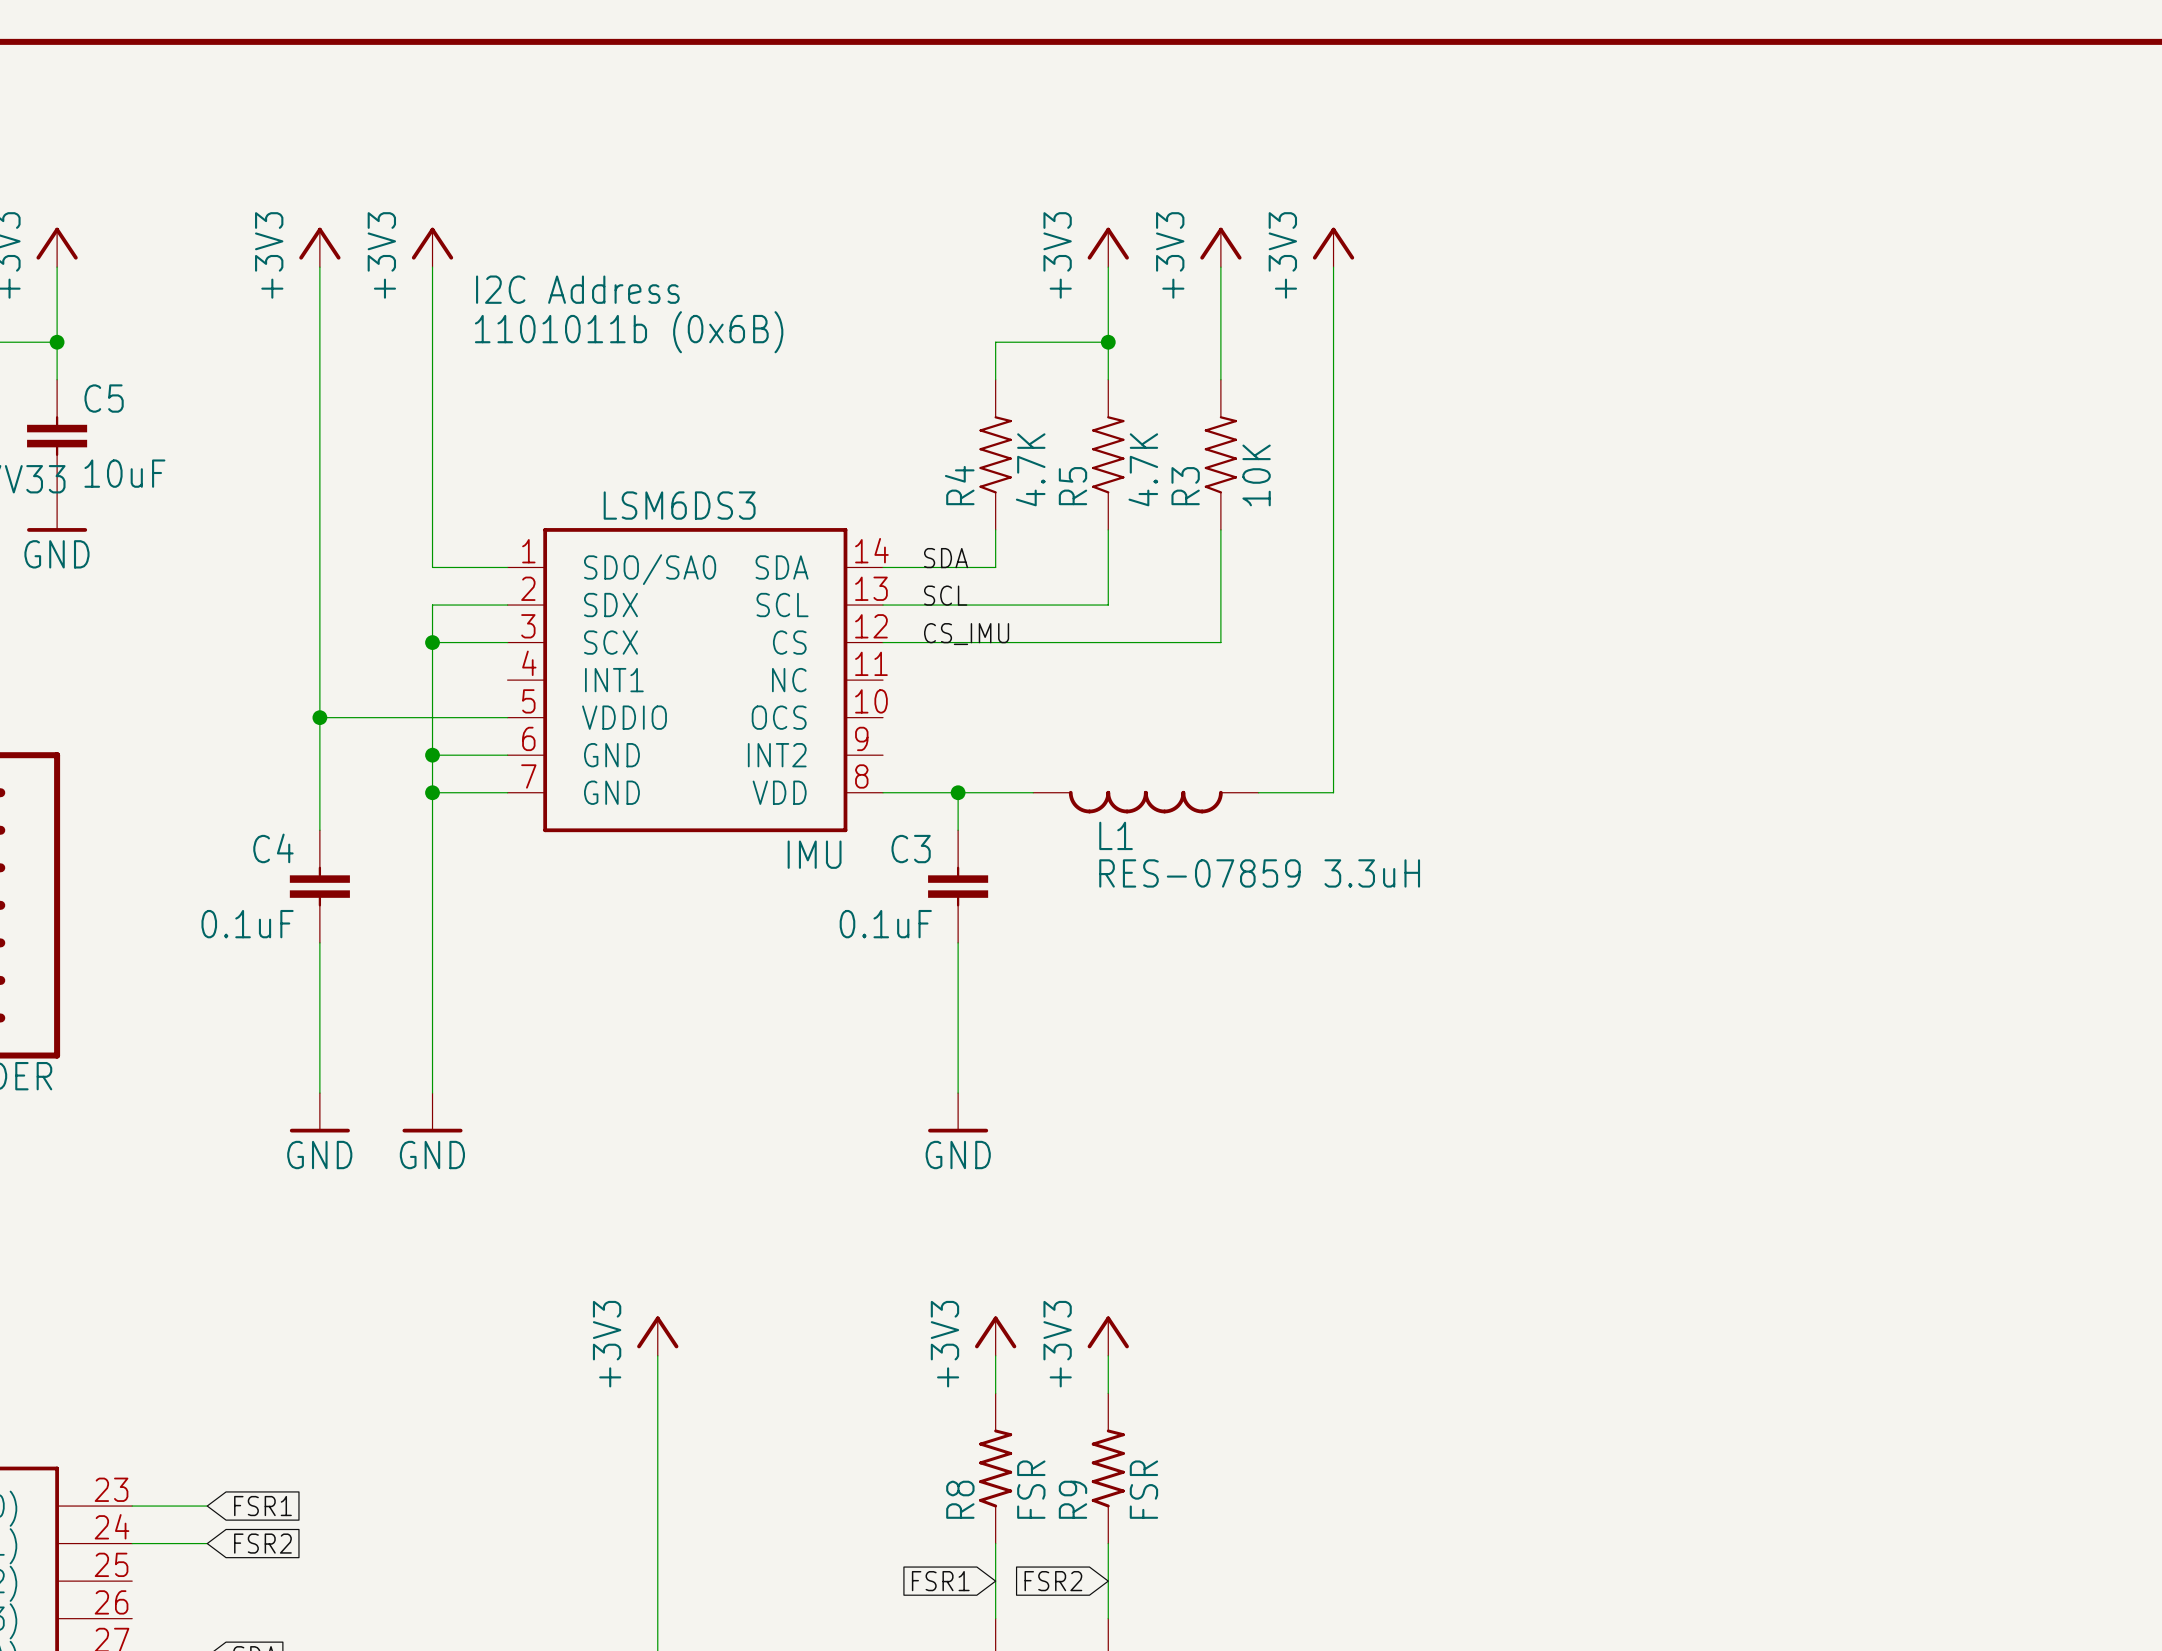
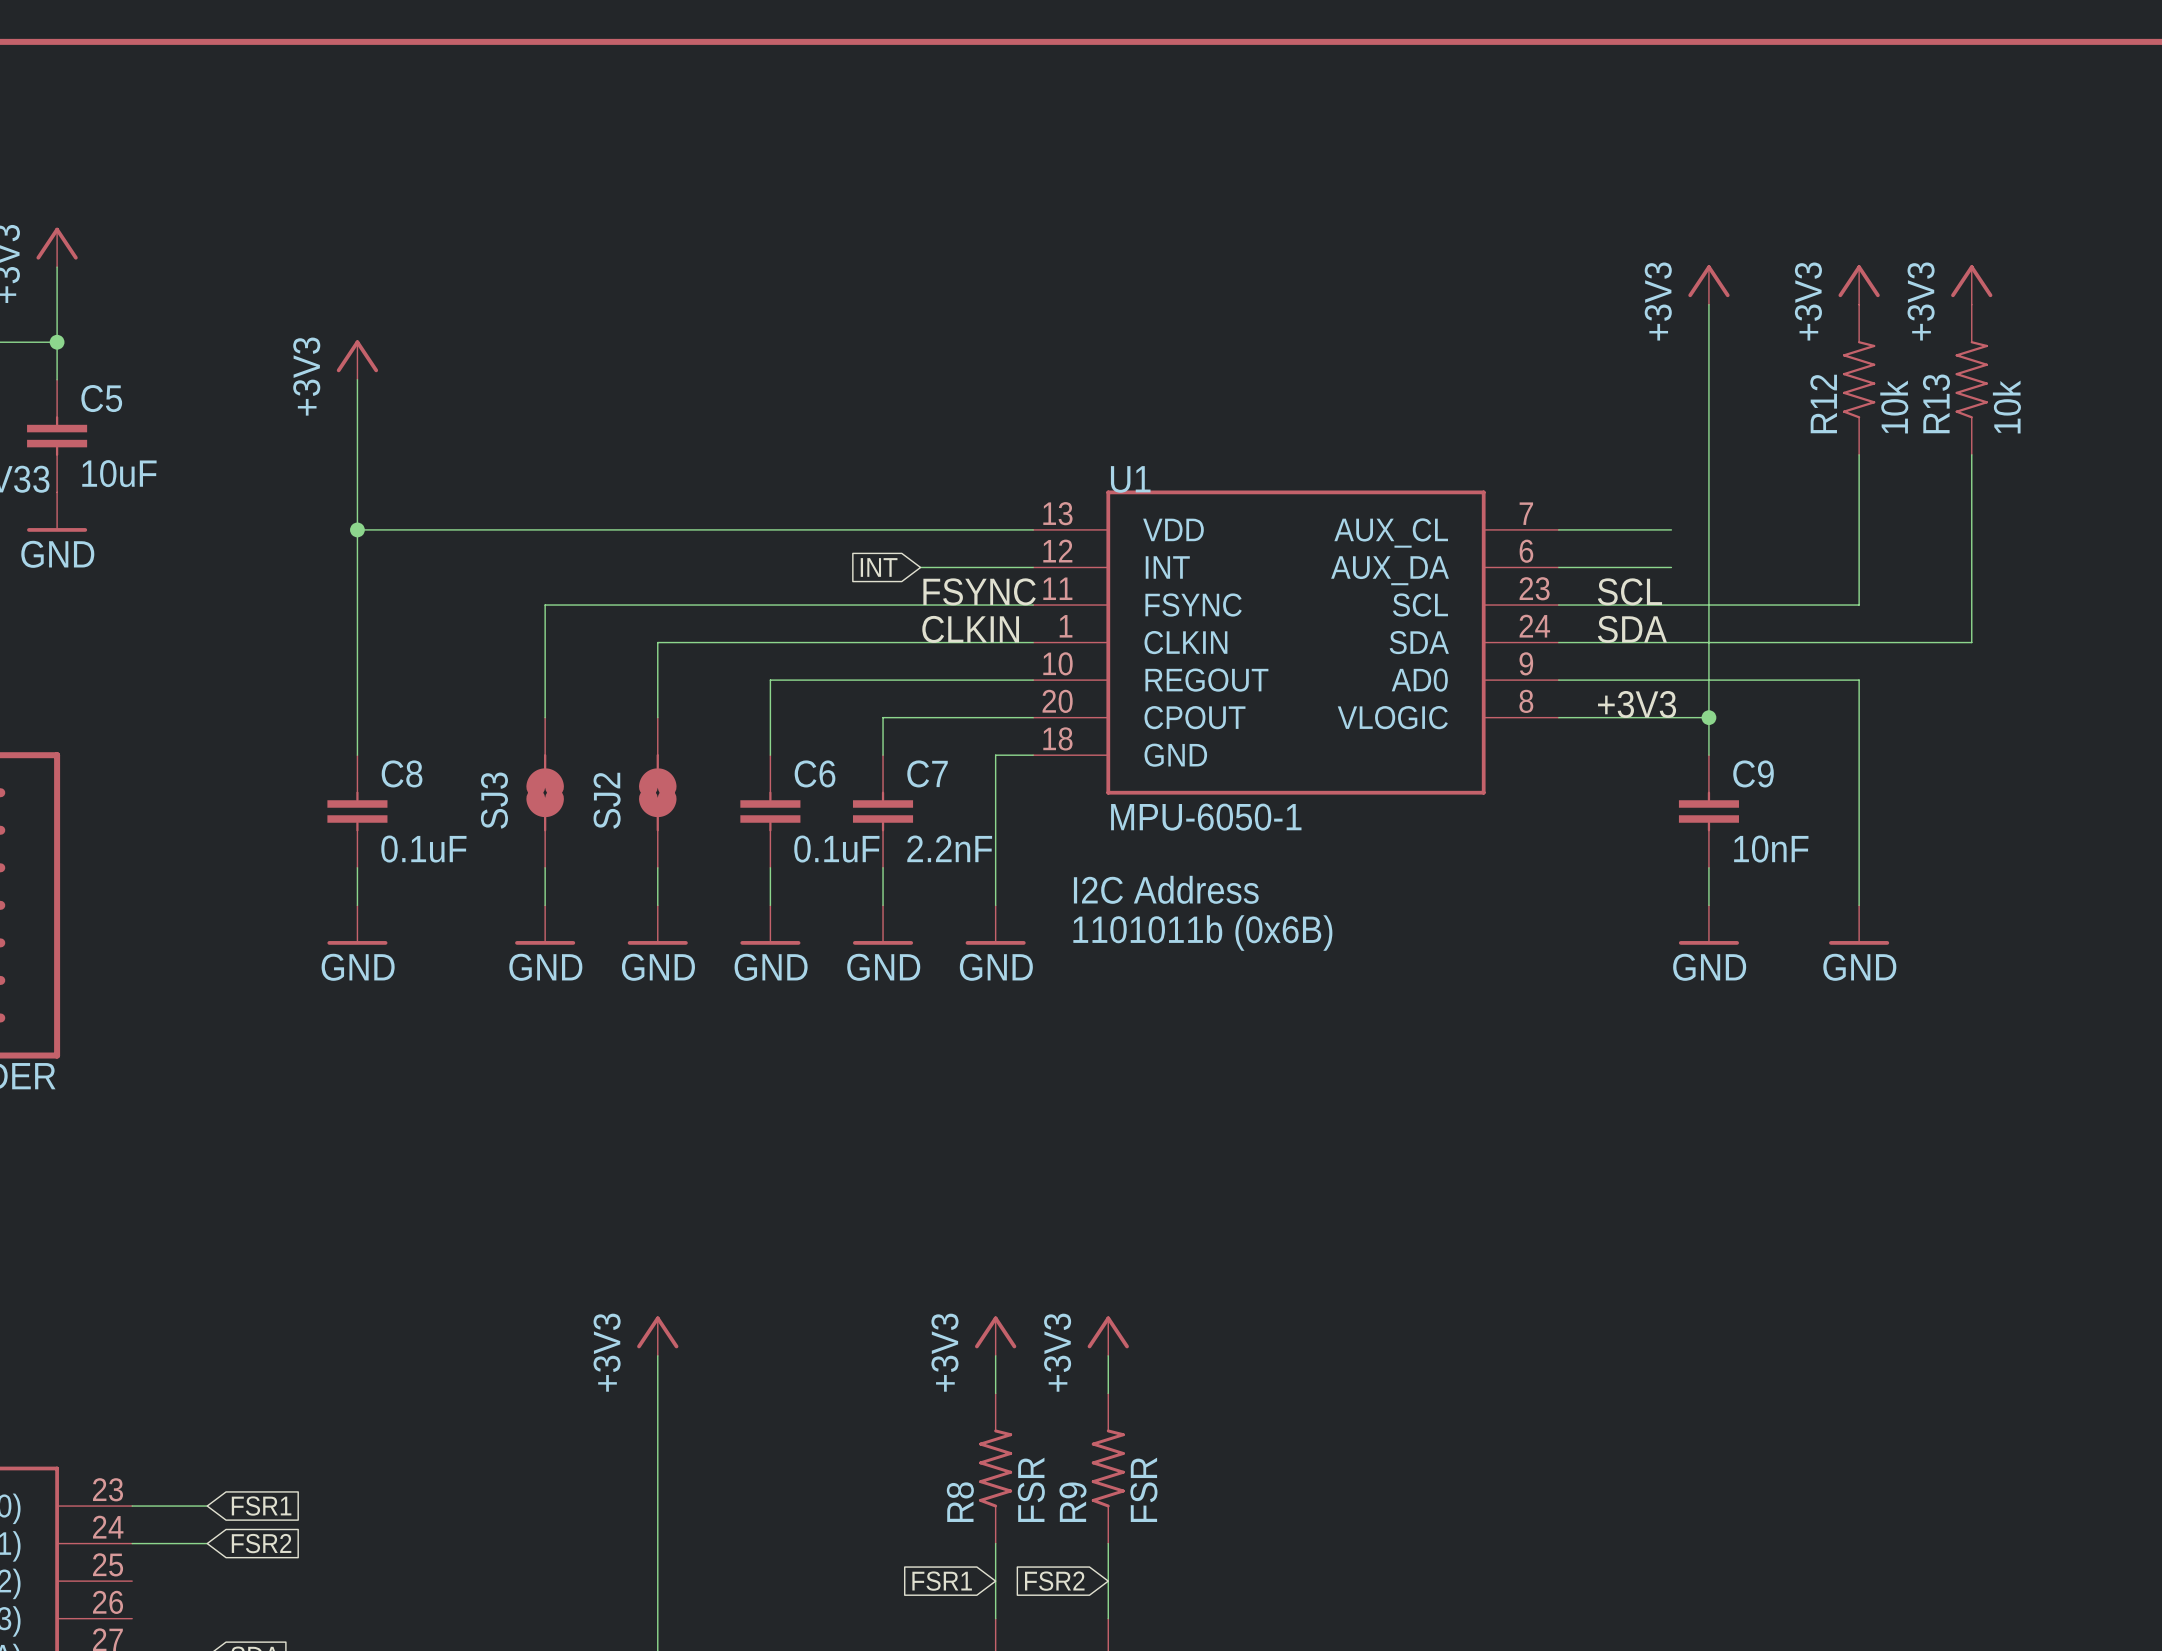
power symbol: +3V3 (319, 247) -> none
power symbol: +3V3 (432, 247) -> none
power symbol: +3V3 (1108, 247) -> none
power symbol: +3V3 (1220, 247) -> none
power symbol: +3V3 (1333, 247) -> none
wire: (319, 267) (319, 830) -> none
wire: (432, 267) (432, 567) (507, 567) -> none
wire: (1108, 267) (1108, 379) -> none
wire: (1220, 267) (1220, 379) -> none
wire: (1333, 267) (1333, 792) (1258, 792) -> none
power symbol: none -> +3V3 (1708, 284)
power symbol: none -> +3V3 (1859, 284)
power symbol: none -> +3V3 (1971, 284)
text: I2C Address (577, 289) -> none
wire: none -> (1708, 304) (1708, 755)
text: 1101011b (0x6B) (629, 332) -> none
wire: (1108, 342) (995, 342) (995, 379) -> none
junction: (1108, 342) -> none
power symbol: none -> +3V3 (357, 360)
wire: none -> (357, 379) (357, 755)
R12: none -> 10k (1859, 379)
R13: none -> 10k (1971, 379)
R4: 4.7K (995, 454) -> none
R5: 4.7K (1108, 454) -> none
R3: 10K (1220, 454) -> none
wire: none -> (1859, 454) (1859, 605) (1558, 605)
wire: none -> (1971, 454) (1971, 642) (1558, 642)
wire: none -> (357, 529) (1033, 529)
junction: none -> (357, 529)
wire: (995, 529) (995, 567) -> (1033, 567) (995, 567)
wire: (1220, 529) (1220, 642) (1033, 642) -> none
wire: none -> (1558, 529) (1671, 529)
label: SDA (946, 558) -> none
global label: none -> INT (879, 567)
wire: (883, 567) (920, 567) -> none
wire: none -> (1558, 567) (1671, 567)
label: none -> SCL (1629, 591)
label: SCL (945, 595) -> FSYNC (979, 591)
wire: (507, 605) (432, 605) (432, 1093) -> none
wire: none -> (883, 605) (545, 605) (545, 717)
label: none -> SDA (1632, 629)
label: CS_IMU (966, 634) -> CLKIN (970, 629)
wire: (432, 642) (507, 642) -> none
junction: (432, 642) -> none
wire: none -> (883, 642) (657, 642) (657, 717)
U1: none -> MPU-6050-1 (1295, 642)
IMU: LSM6DS3 (695, 680) -> none
wire: none -> (1033, 680) (770, 680) (770, 755)
wire: none -> (1558, 680) (1859, 680) (1859, 905)
label: none -> +3V3 (1637, 704)
wire: (319, 717) (507, 717) -> none
junction: (319, 717) -> none
wire: none -> (1033, 717) (883, 717) (883, 755)
wire: none -> (1558, 717) (1708, 717)
junction: none -> (1708, 717)
wire: (432, 755) (507, 755) -> none
junction: (432, 755) -> none
wire: none -> (1033, 755) (995, 755) (995, 905)
wire: (432, 792) (507, 792) -> none
junction: (432, 792) -> none
SJ3: none -> (545, 792)
SJ2: none -> (657, 792)
wire: (883, 792) (1033, 792) -> none
wire: (958, 792) (958, 830) -> (883, 867) (883, 905)
junction: (958, 792) -> none
L1: RES-07859 3.3uH (1145, 802) -> none
C8: none -> 0.1uF (357, 811)
C6: none -> 0.1uF (770, 811)
C7: none -> 2.2nF (883, 811)
C9: none -> 10nF (1708, 811)
wire: none -> (357, 867) (357, 905)
wire: none -> (545, 867) (545, 905)
wire: none -> (657, 867) (657, 905)
wire: none -> (770, 867) (770, 905)
wire: none -> (1708, 867) (1708, 905)
C4: 0.1uF (319, 886) -> none
C3: 0.1uF (958, 886) -> none
text: none -> I2C Address (1166, 889)
power symbol: none -> GND (357, 925)
power symbol: none -> GND (545, 925)
power symbol: none -> GND (657, 925)
power symbol: none -> GND (770, 925)
power symbol: none -> GND (883, 925)
power symbol: none -> GND (995, 925)
power symbol: none -> GND (1708, 925)
power symbol: none -> GND (1859, 925)
text: none -> 1101011b (0x6B) (1202, 933)
wire: (319, 942) (319, 1093) -> none
wire: (958, 942) (958, 1093) -> none
power symbol: GND (319, 1112) -> none
power symbol: GND (432, 1112) -> none
power symbol: GND (958, 1112) -> none

